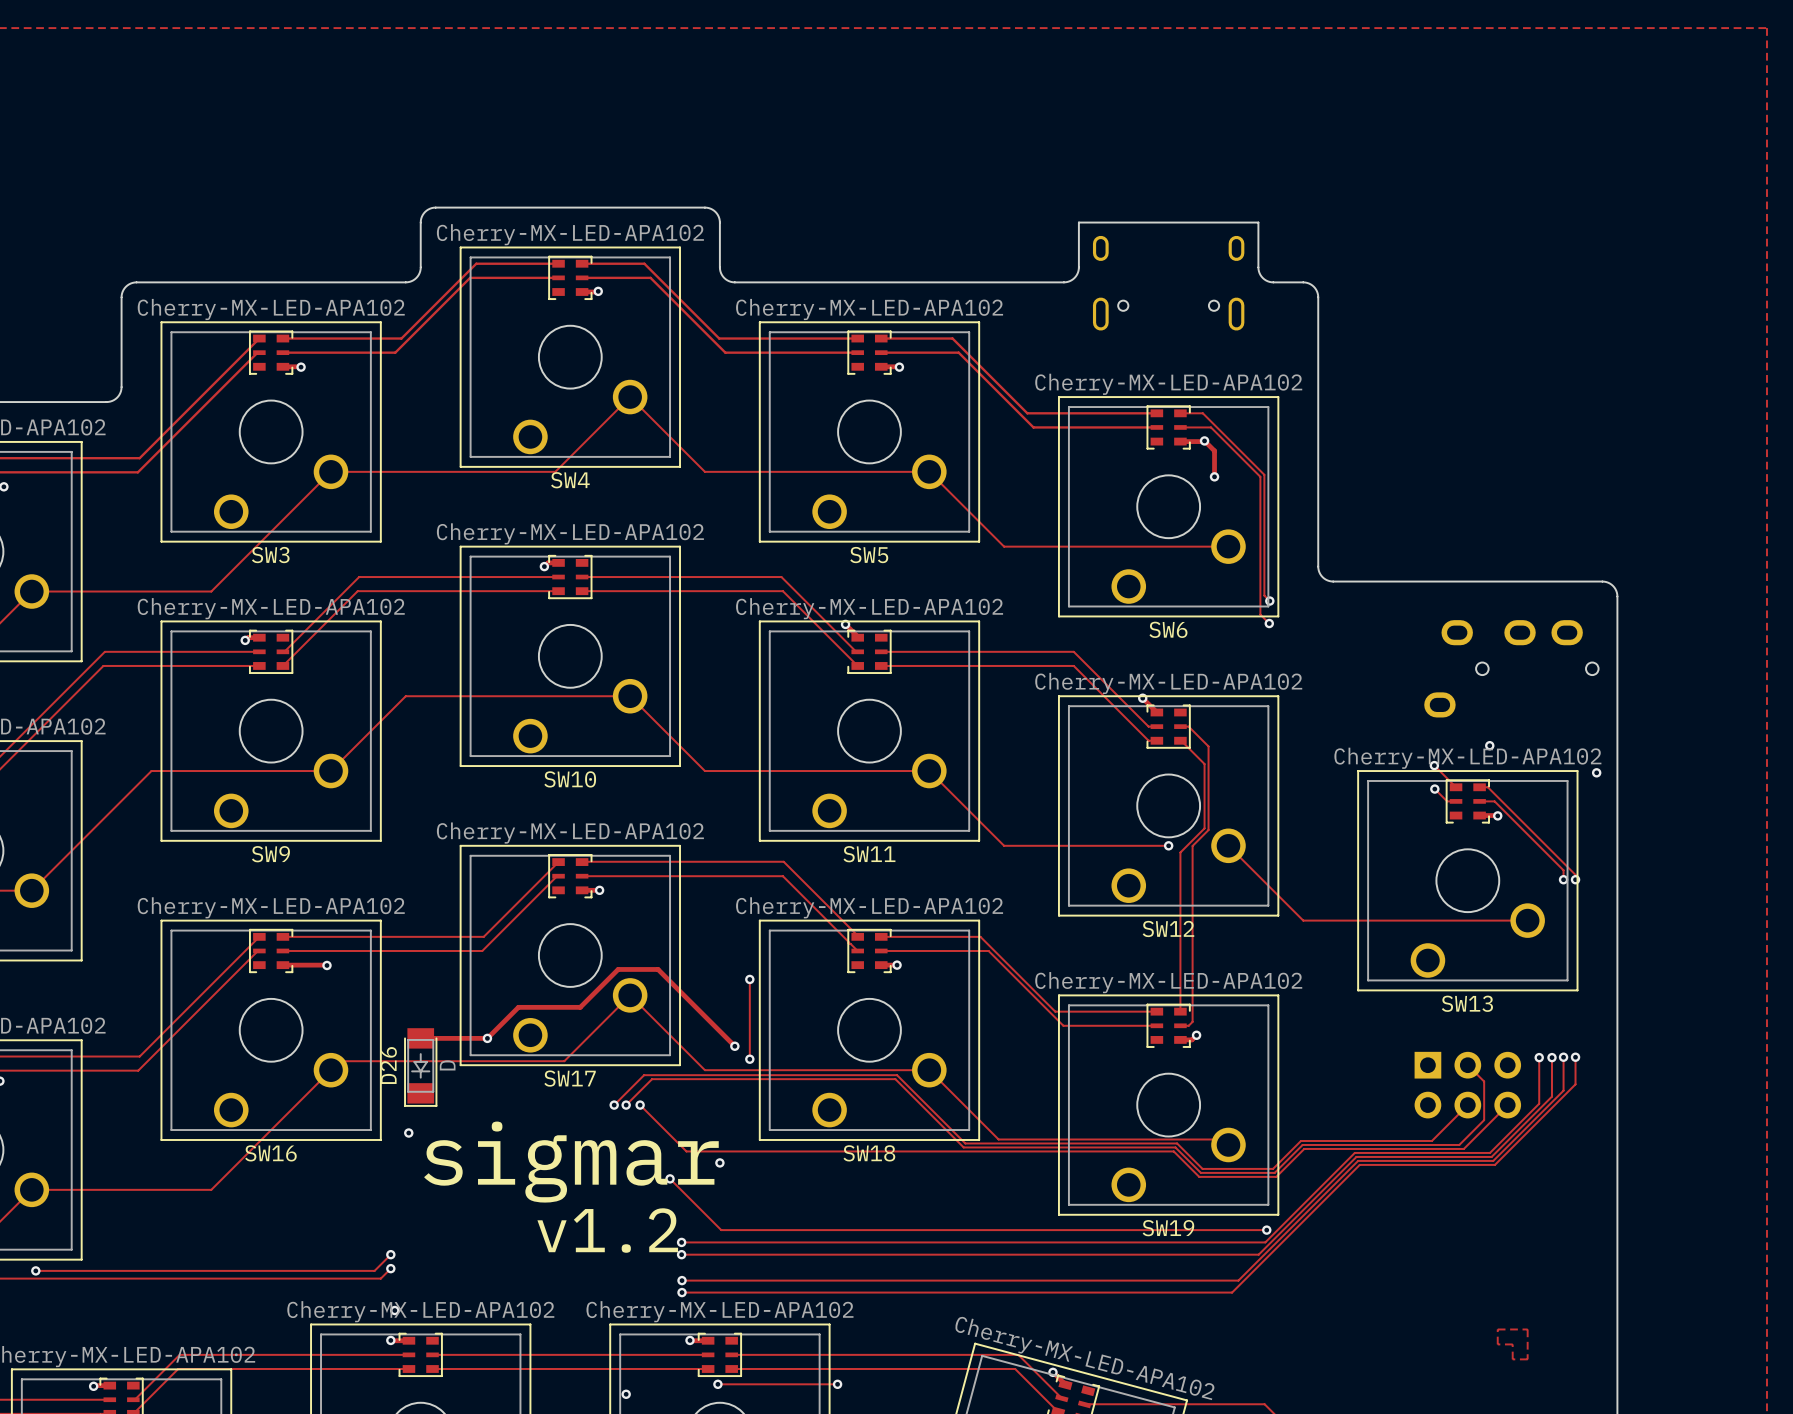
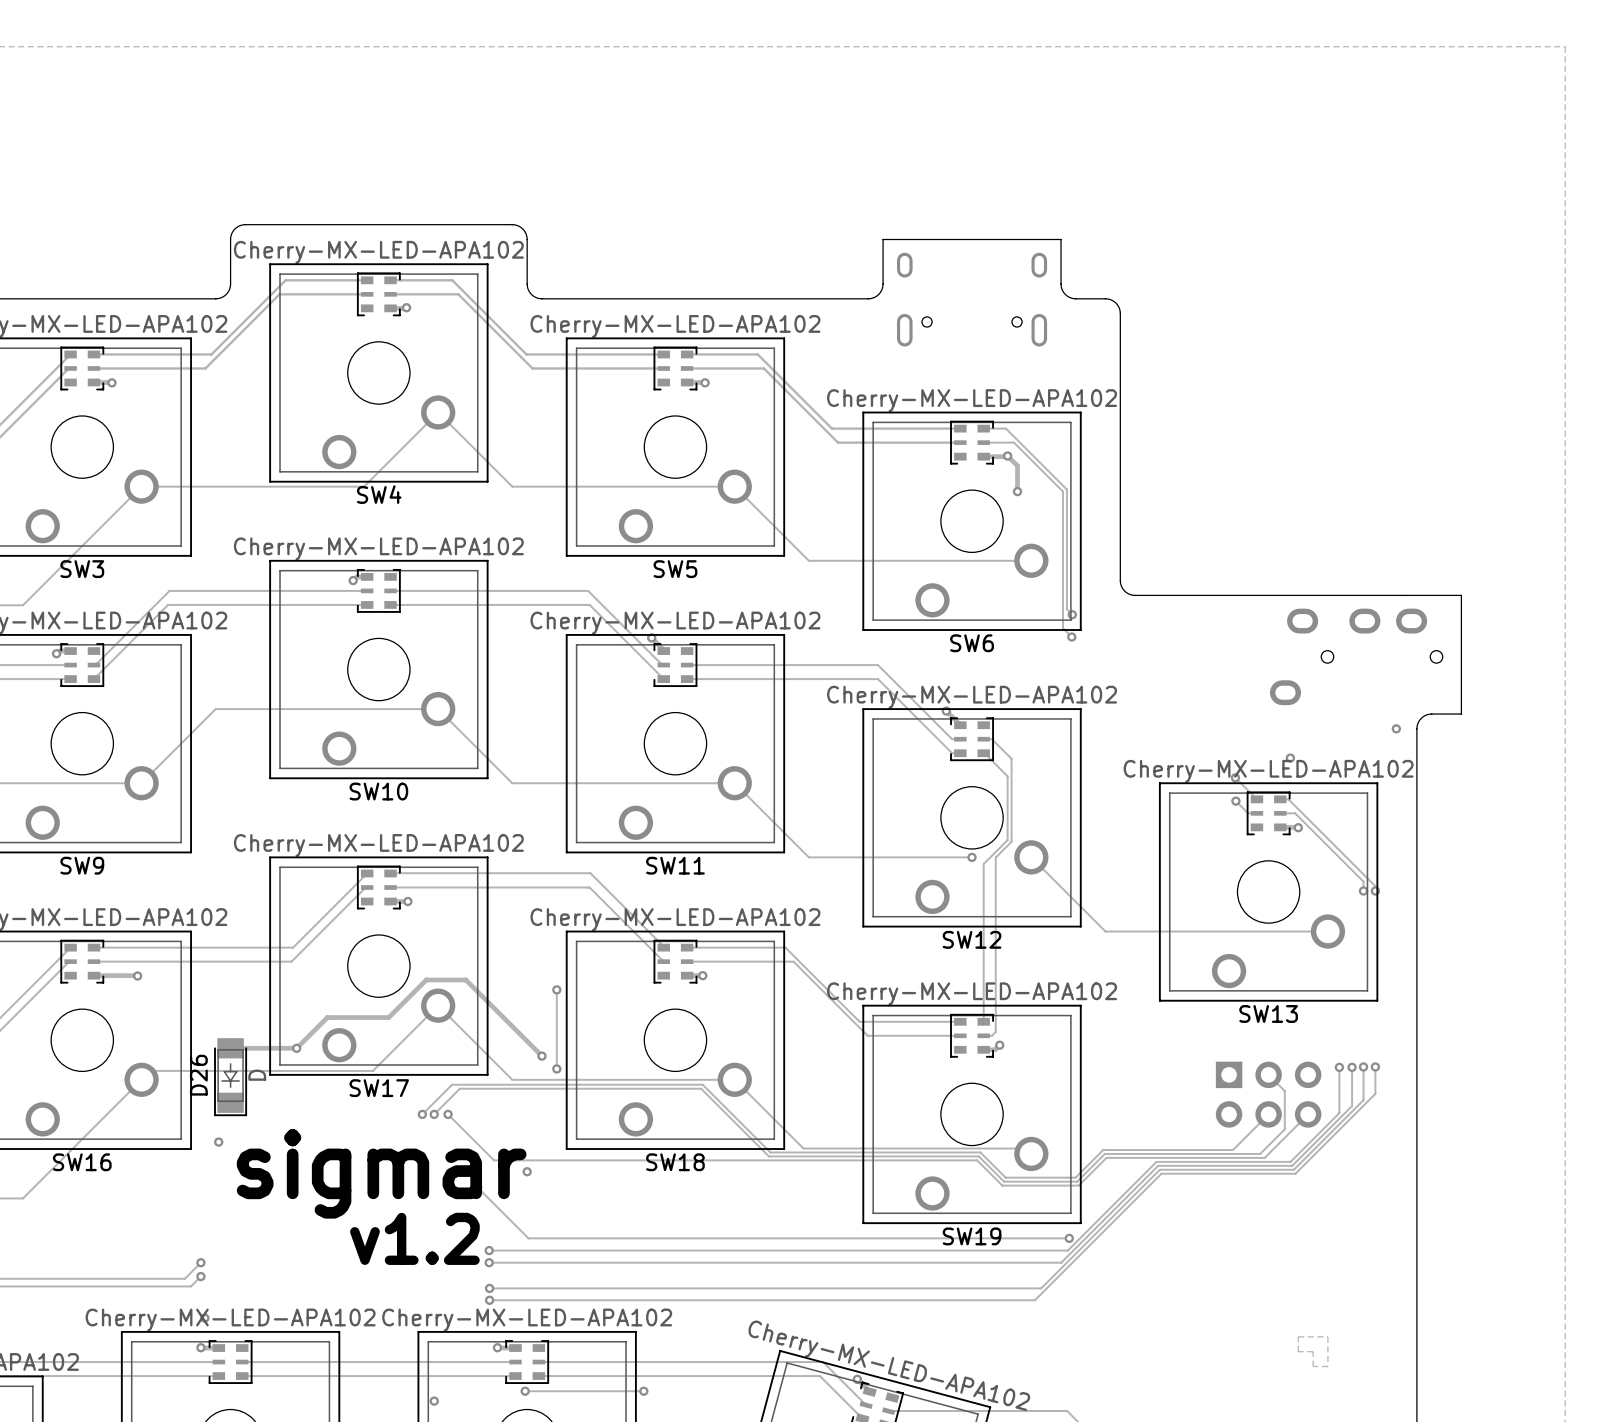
board edge: (1602, 581) (1611, 584) (1617, 594) (1617, 716) -> (1402, 595) (1461, 595) (1461, 714) (1427, 714) (1419, 719) (1416, 728)
part position: (1511, 668) -> (1356, 656)
via position: (1596, 772) -> (1396, 728)

